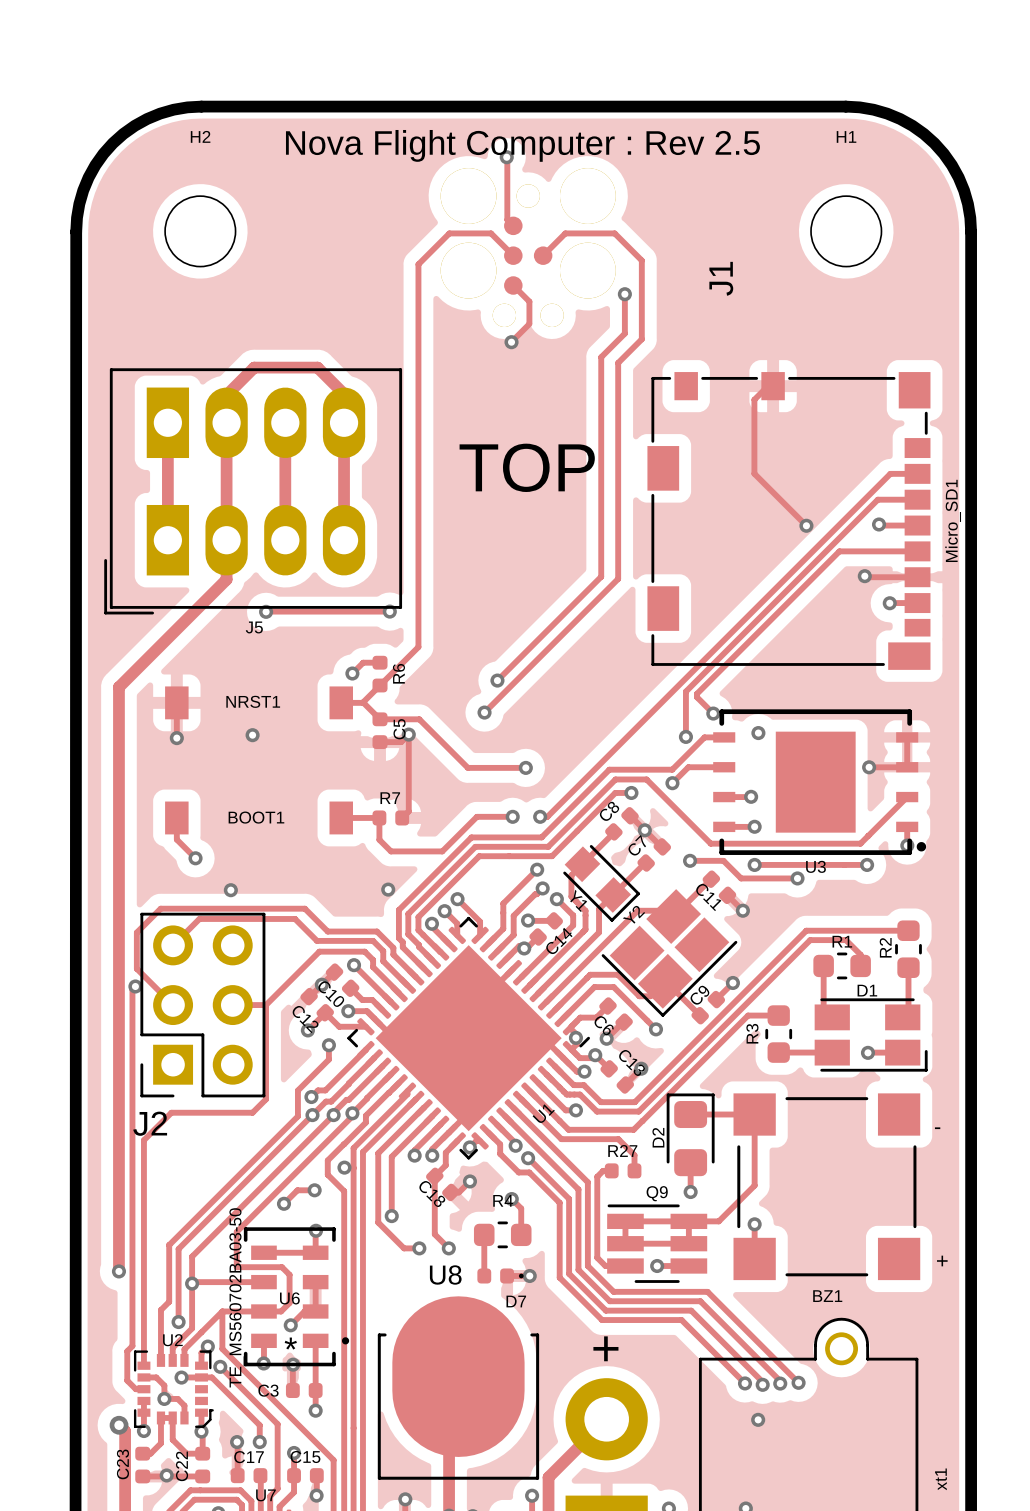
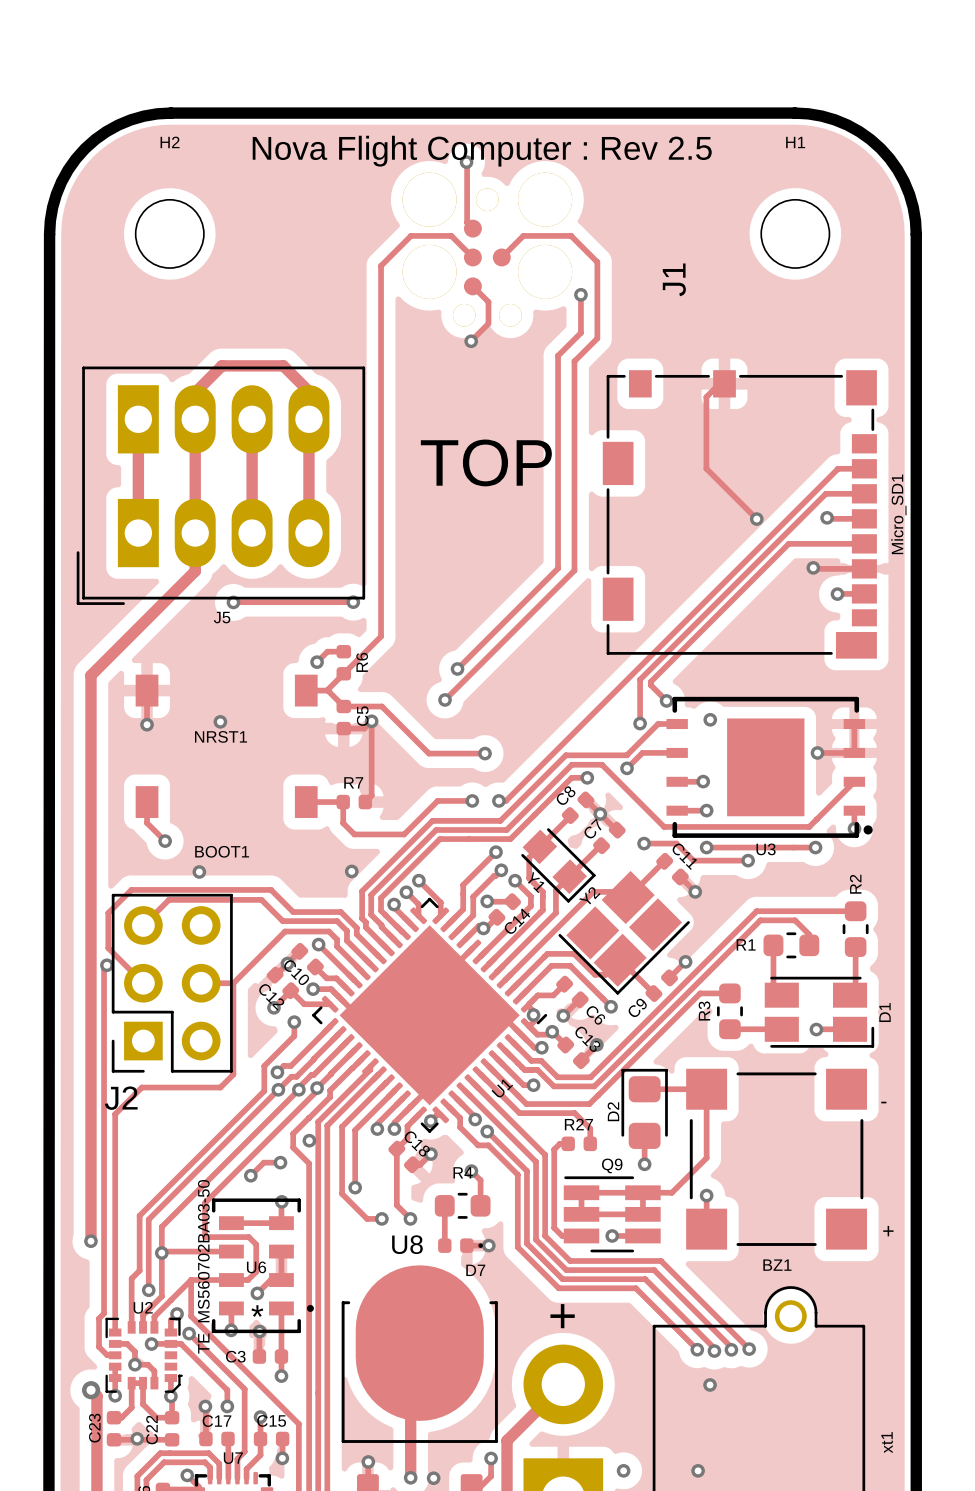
NRST1 name position: NRST1 (253, 701) -> NRST1 (221, 736)
BOOT1 name position: BOOT1 (256, 817) -> BOOT1 (222, 851)
C11 name position: C11 (708, 897) -> C11 (684, 856)
R1 name position: R1 (842, 941) -> R1 (746, 944)
R2 name position: R2 (885, 947) -> R2 (855, 884)
D1 name rotation: 0° (867, 990) -> 90° counterclockwise (885, 1012)
D1 name position: D1 (867, 990) -> D1 (885, 1012)
C9 name position: C9 (700, 995) -> C9 (637, 1007)
C6 name position: C6 (604, 1025) -> C6 (596, 1015)
C18 name position: C18 (432, 1194) -> C18 (417, 1143)

